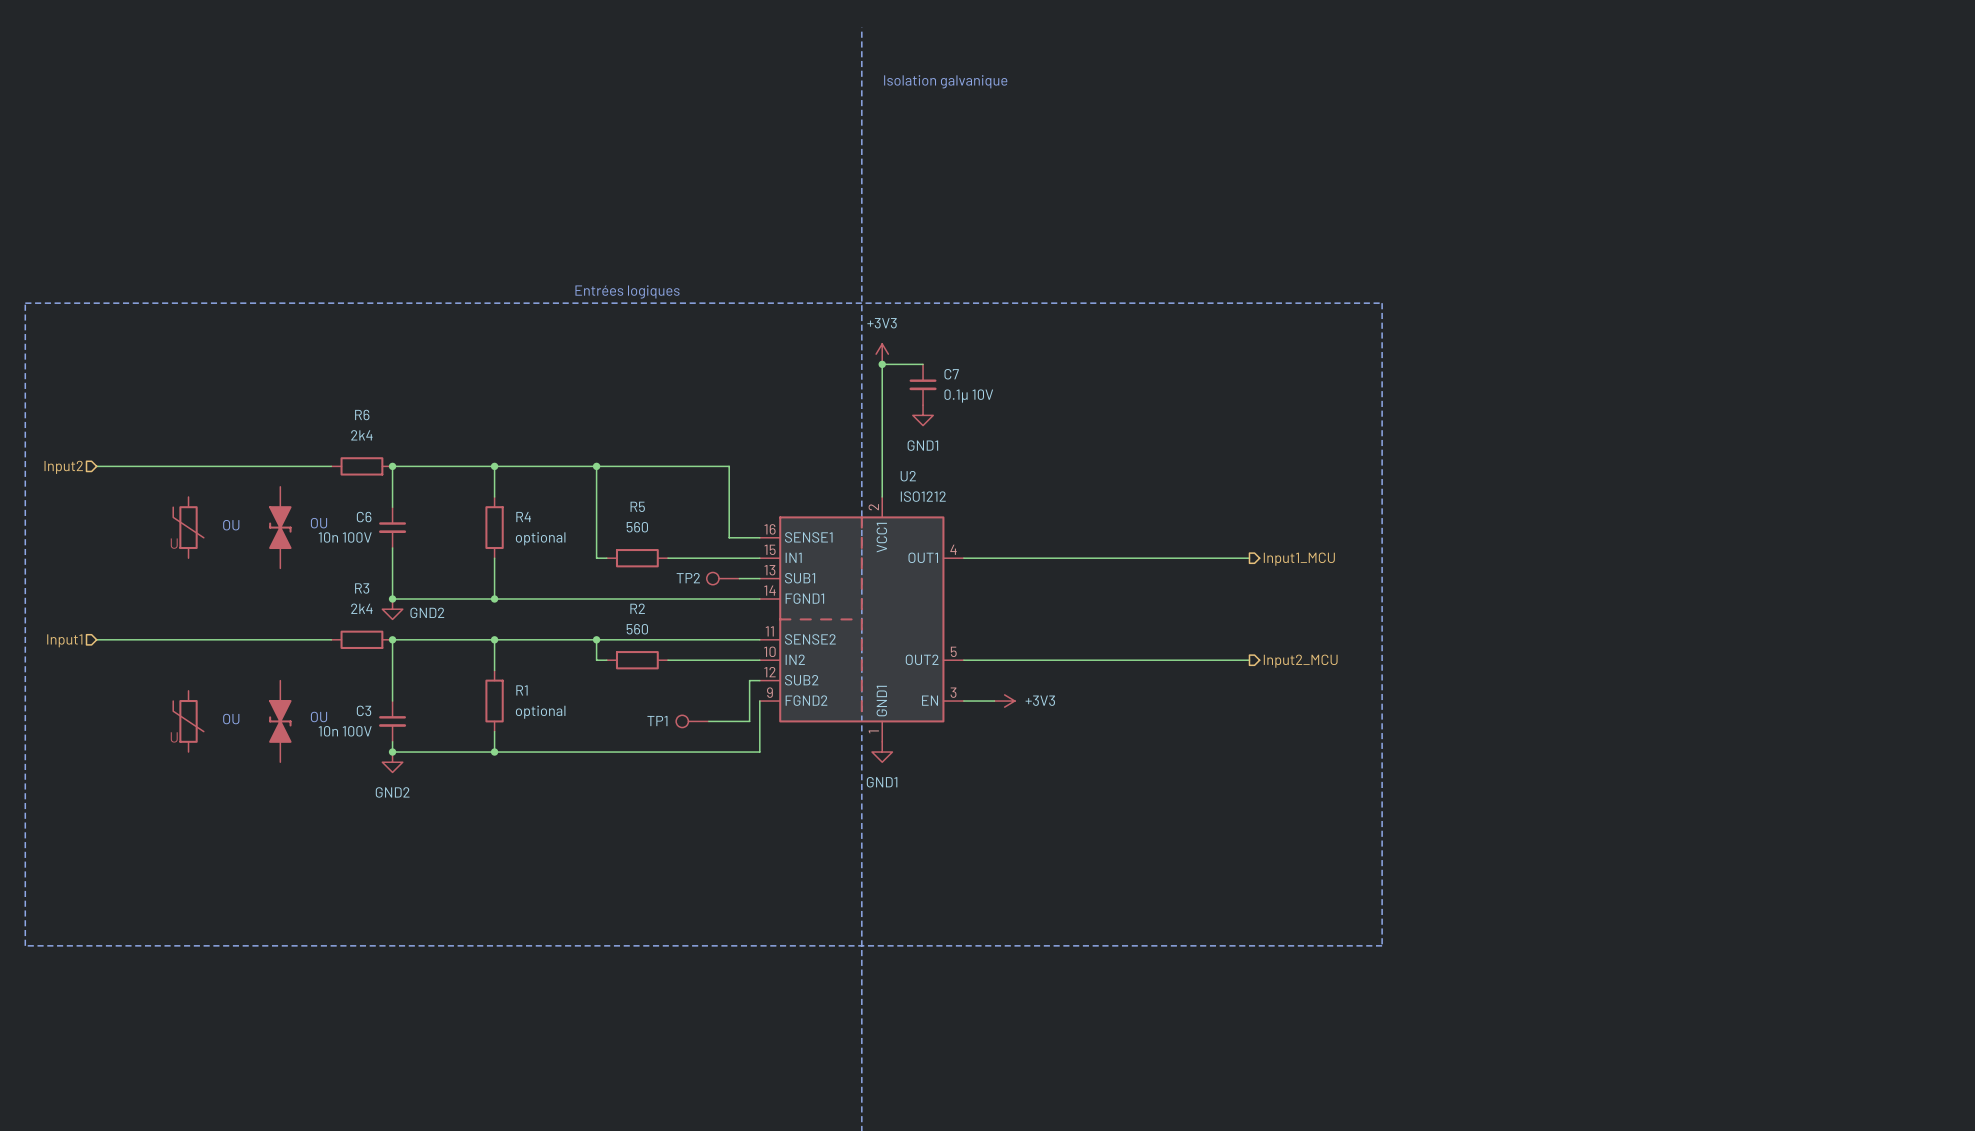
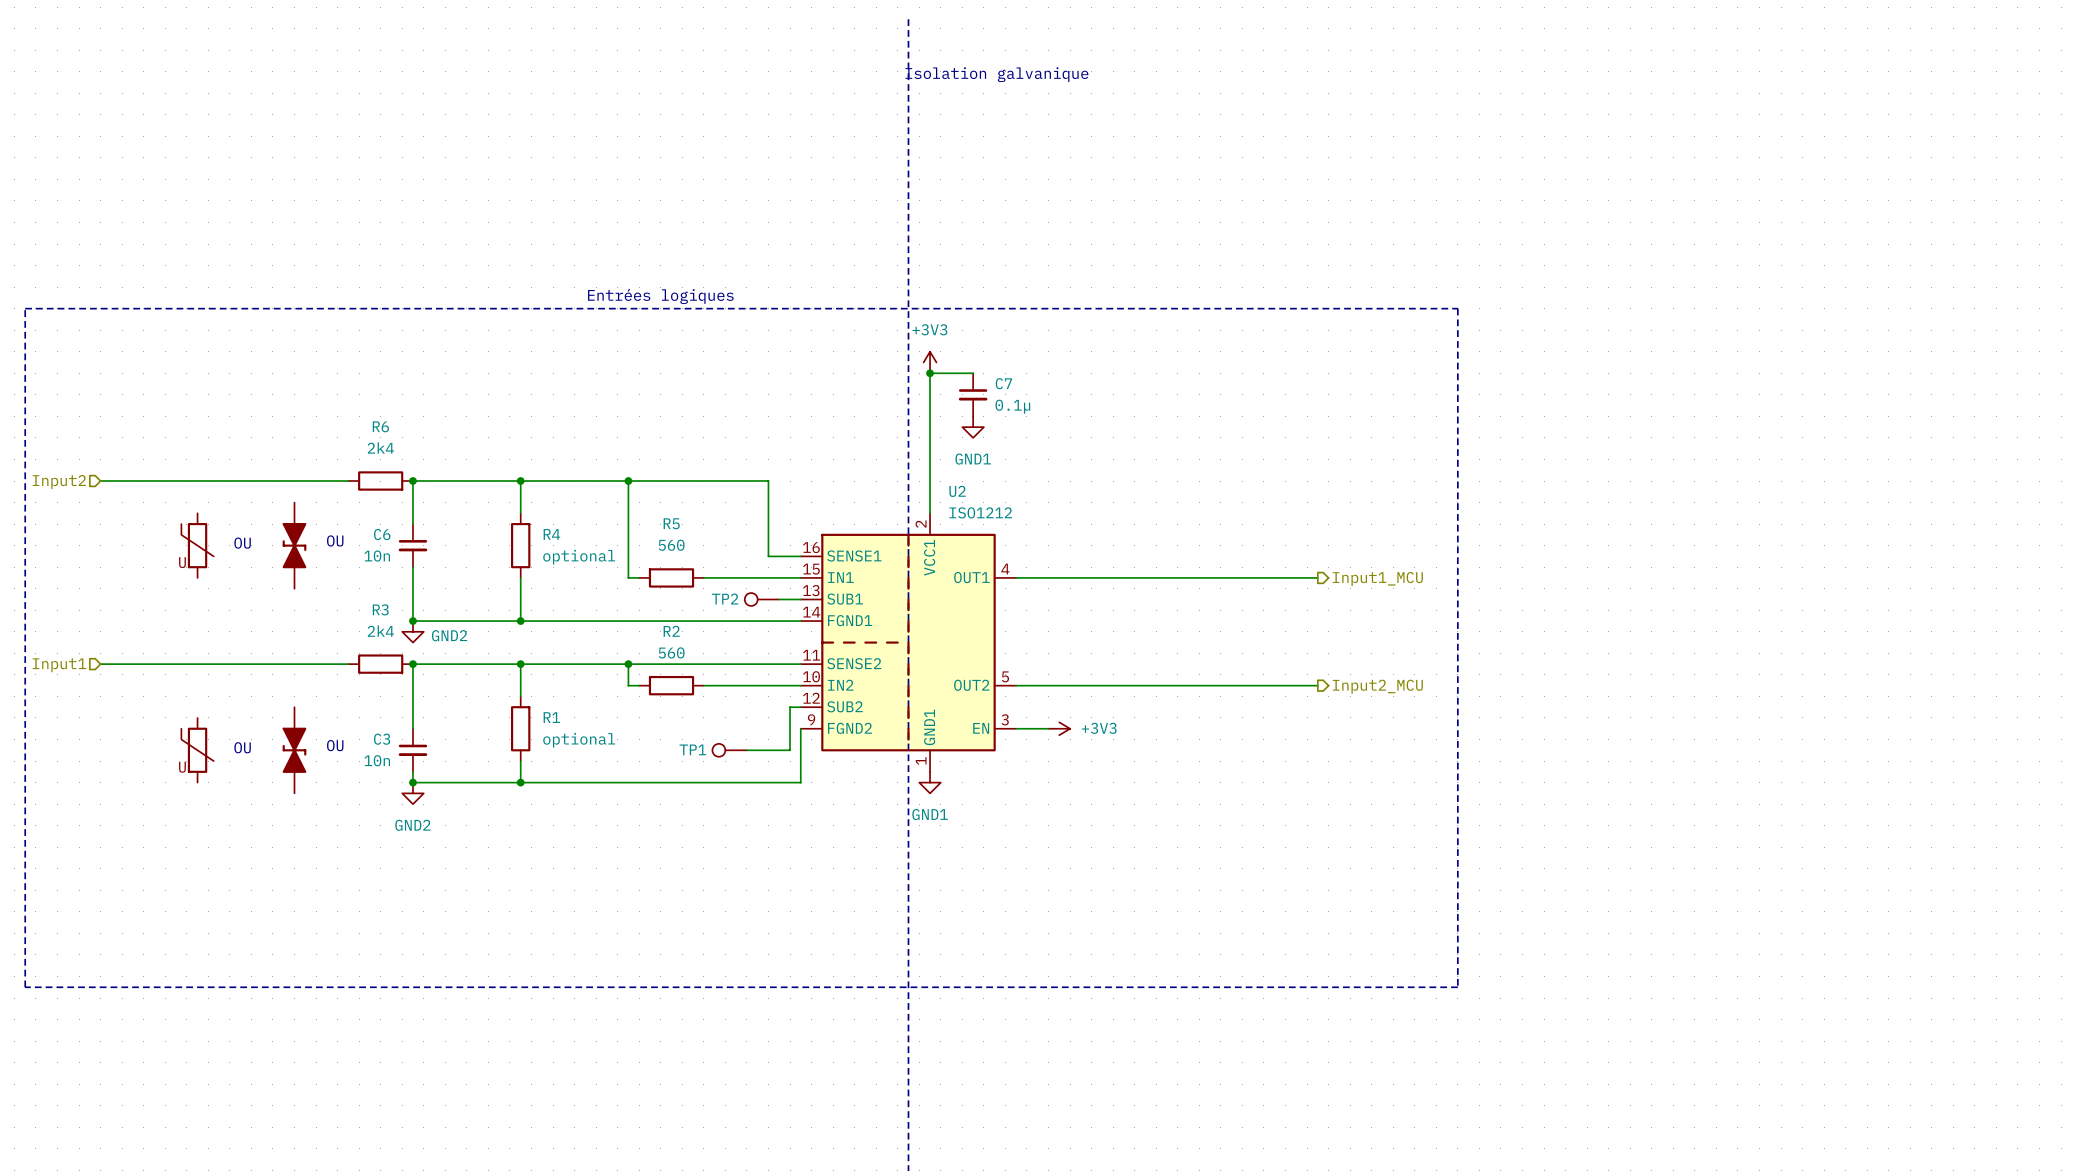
C7 value: 0.1µ 10V (968, 396) -> 0.1µ (1012, 406)
C6 value: 10n 100V (345, 537) -> 10n (377, 556)
C3 value: 10n 100V (345, 731) -> 10n (377, 760)

